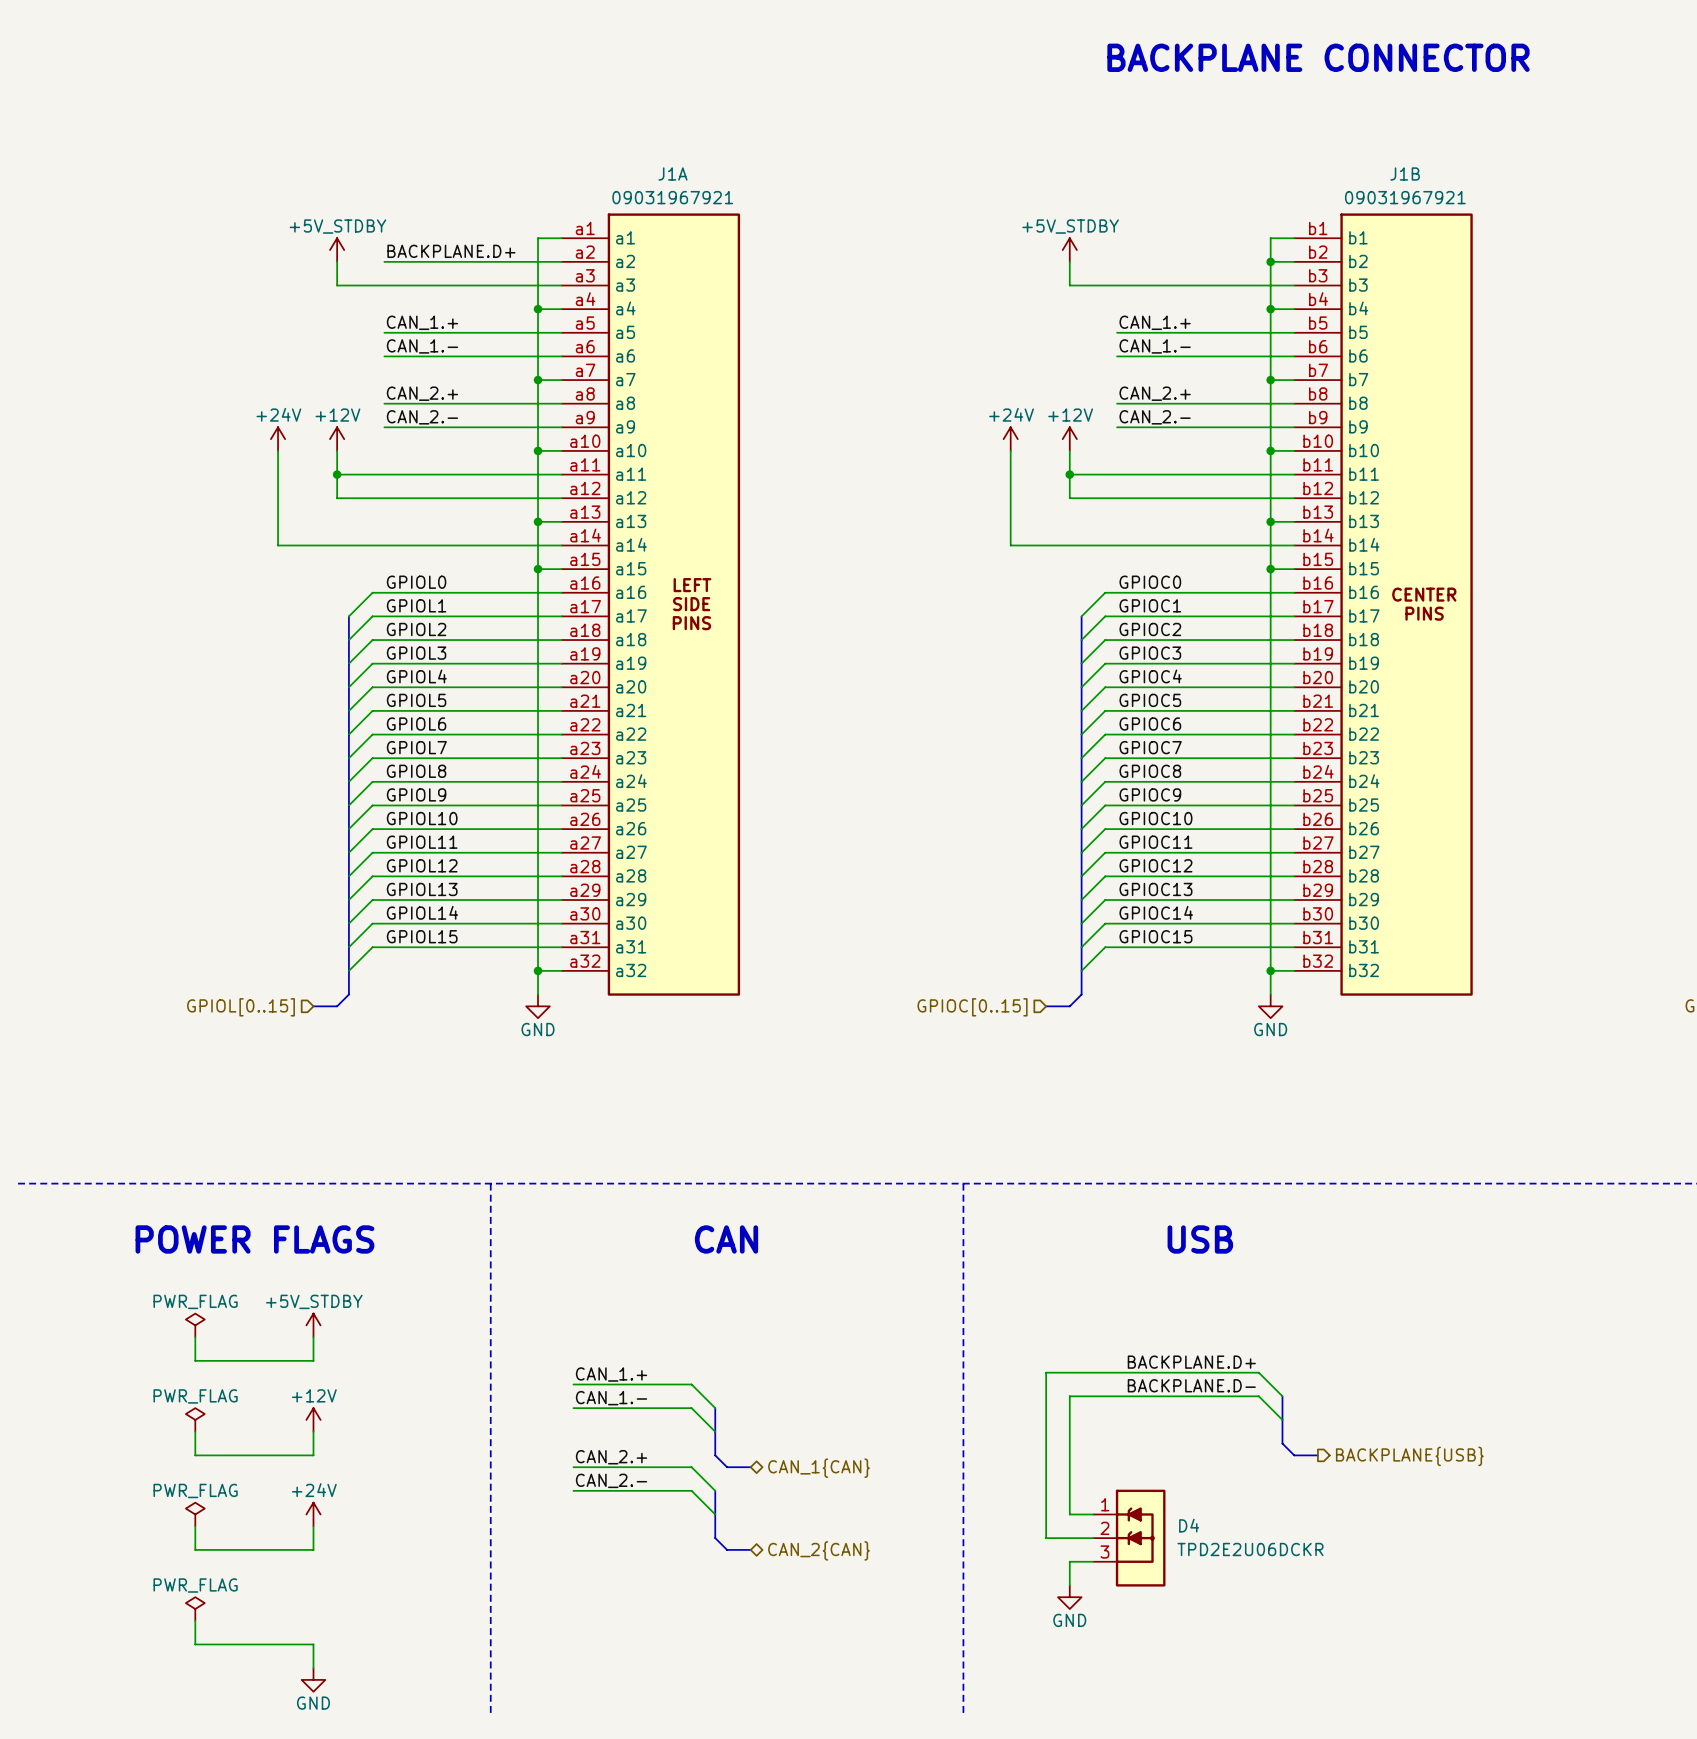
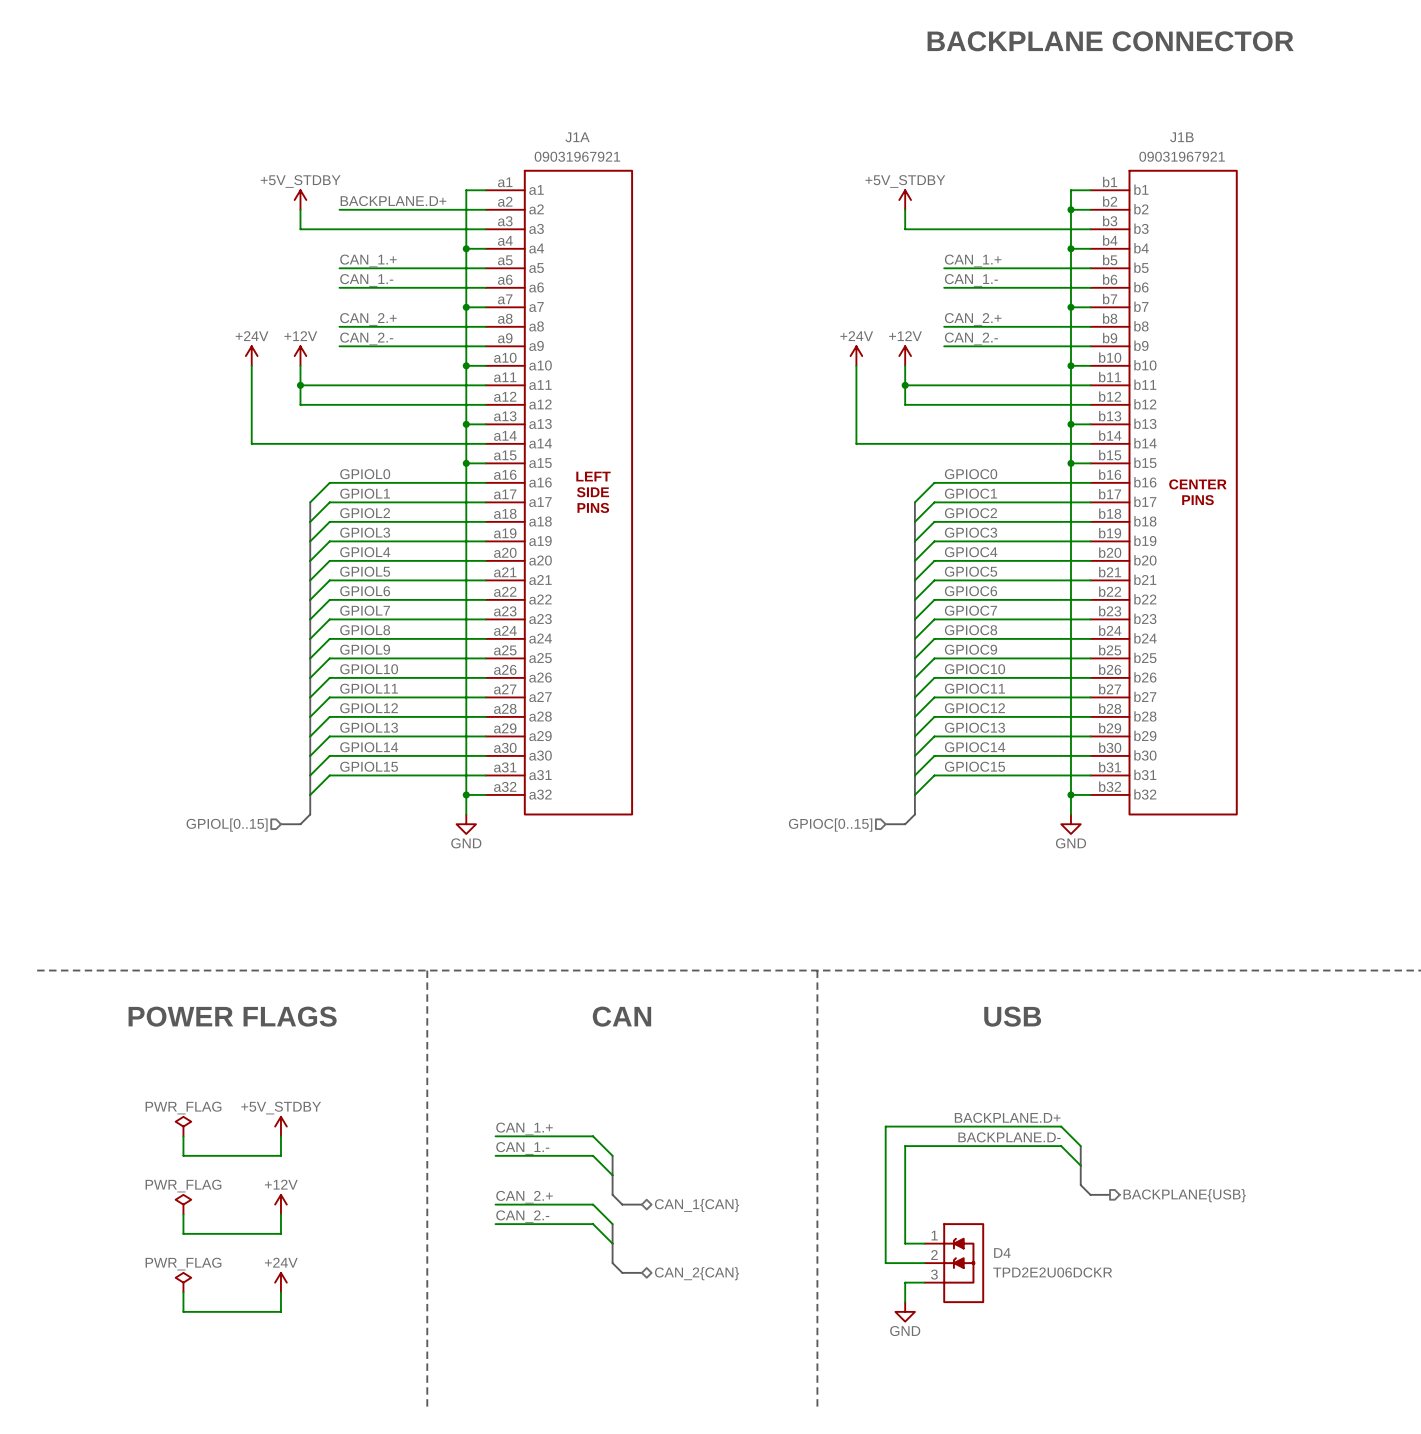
power symbol: PWR_FLAG (195, 1325) -> none
power symbol position: +5V_STDBY (313, 1325) -> +5V_STDBY (280, 1126)
wire: (195, 1337) (195, 1360) (313, 1360) (313, 1337) -> (183, 1136) (183, 1155) (280, 1155) (280, 1136)
power symbol: none -> PWR_FLAG (183, 1126)
power symbol: PWR_FLAG (195, 1419) -> none
power symbol position: +12V (313, 1419) -> +12V (280, 1204)
wire: (195, 1431) (195, 1455) (313, 1455) (313, 1431) -> (183, 1214) (183, 1233) (280, 1233) (280, 1214)
power symbol: none -> PWR_FLAG (183, 1204)
power symbol: PWR_FLAG (195, 1514) -> none
power symbol position: +24V (313, 1514) -> +24V (280, 1282)
wire: (195, 1526) (195, 1549) (313, 1549) (313, 1526) -> (183, 1292) (183, 1311) (280, 1311) (280, 1292)
power symbol: none -> PWR_FLAG (183, 1282)
power symbol: PWR_FLAG (195, 1609) -> none
wire: (195, 1620) (195, 1644) (313, 1644) (313, 1668) -> none
power symbol: GND (313, 1679) -> none

